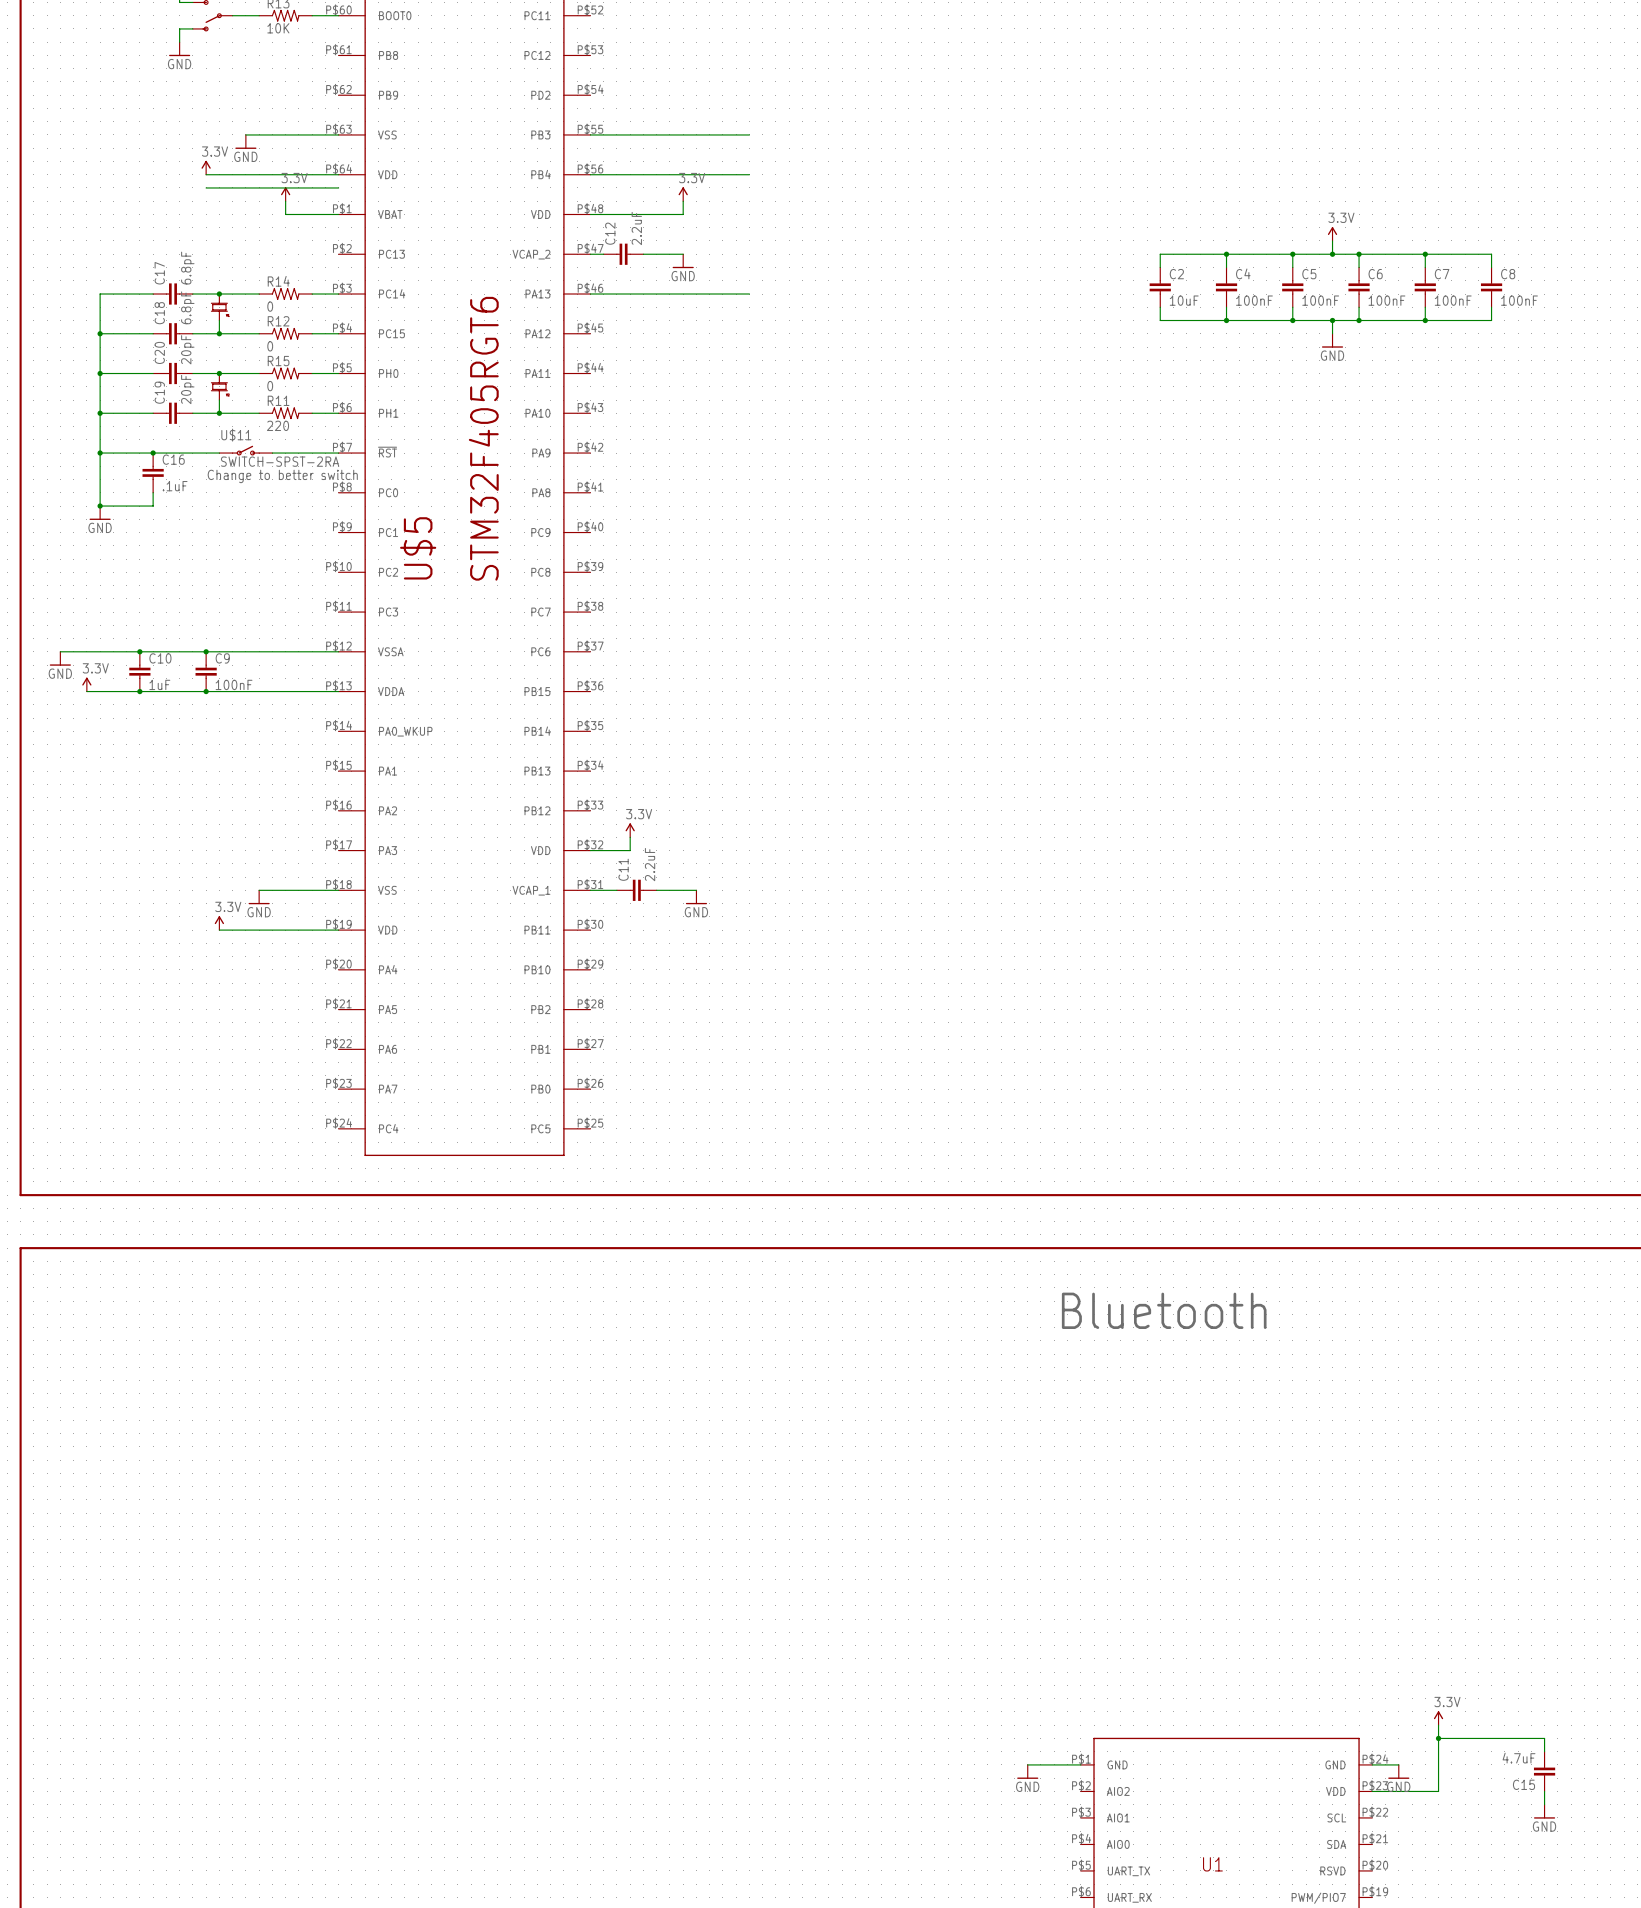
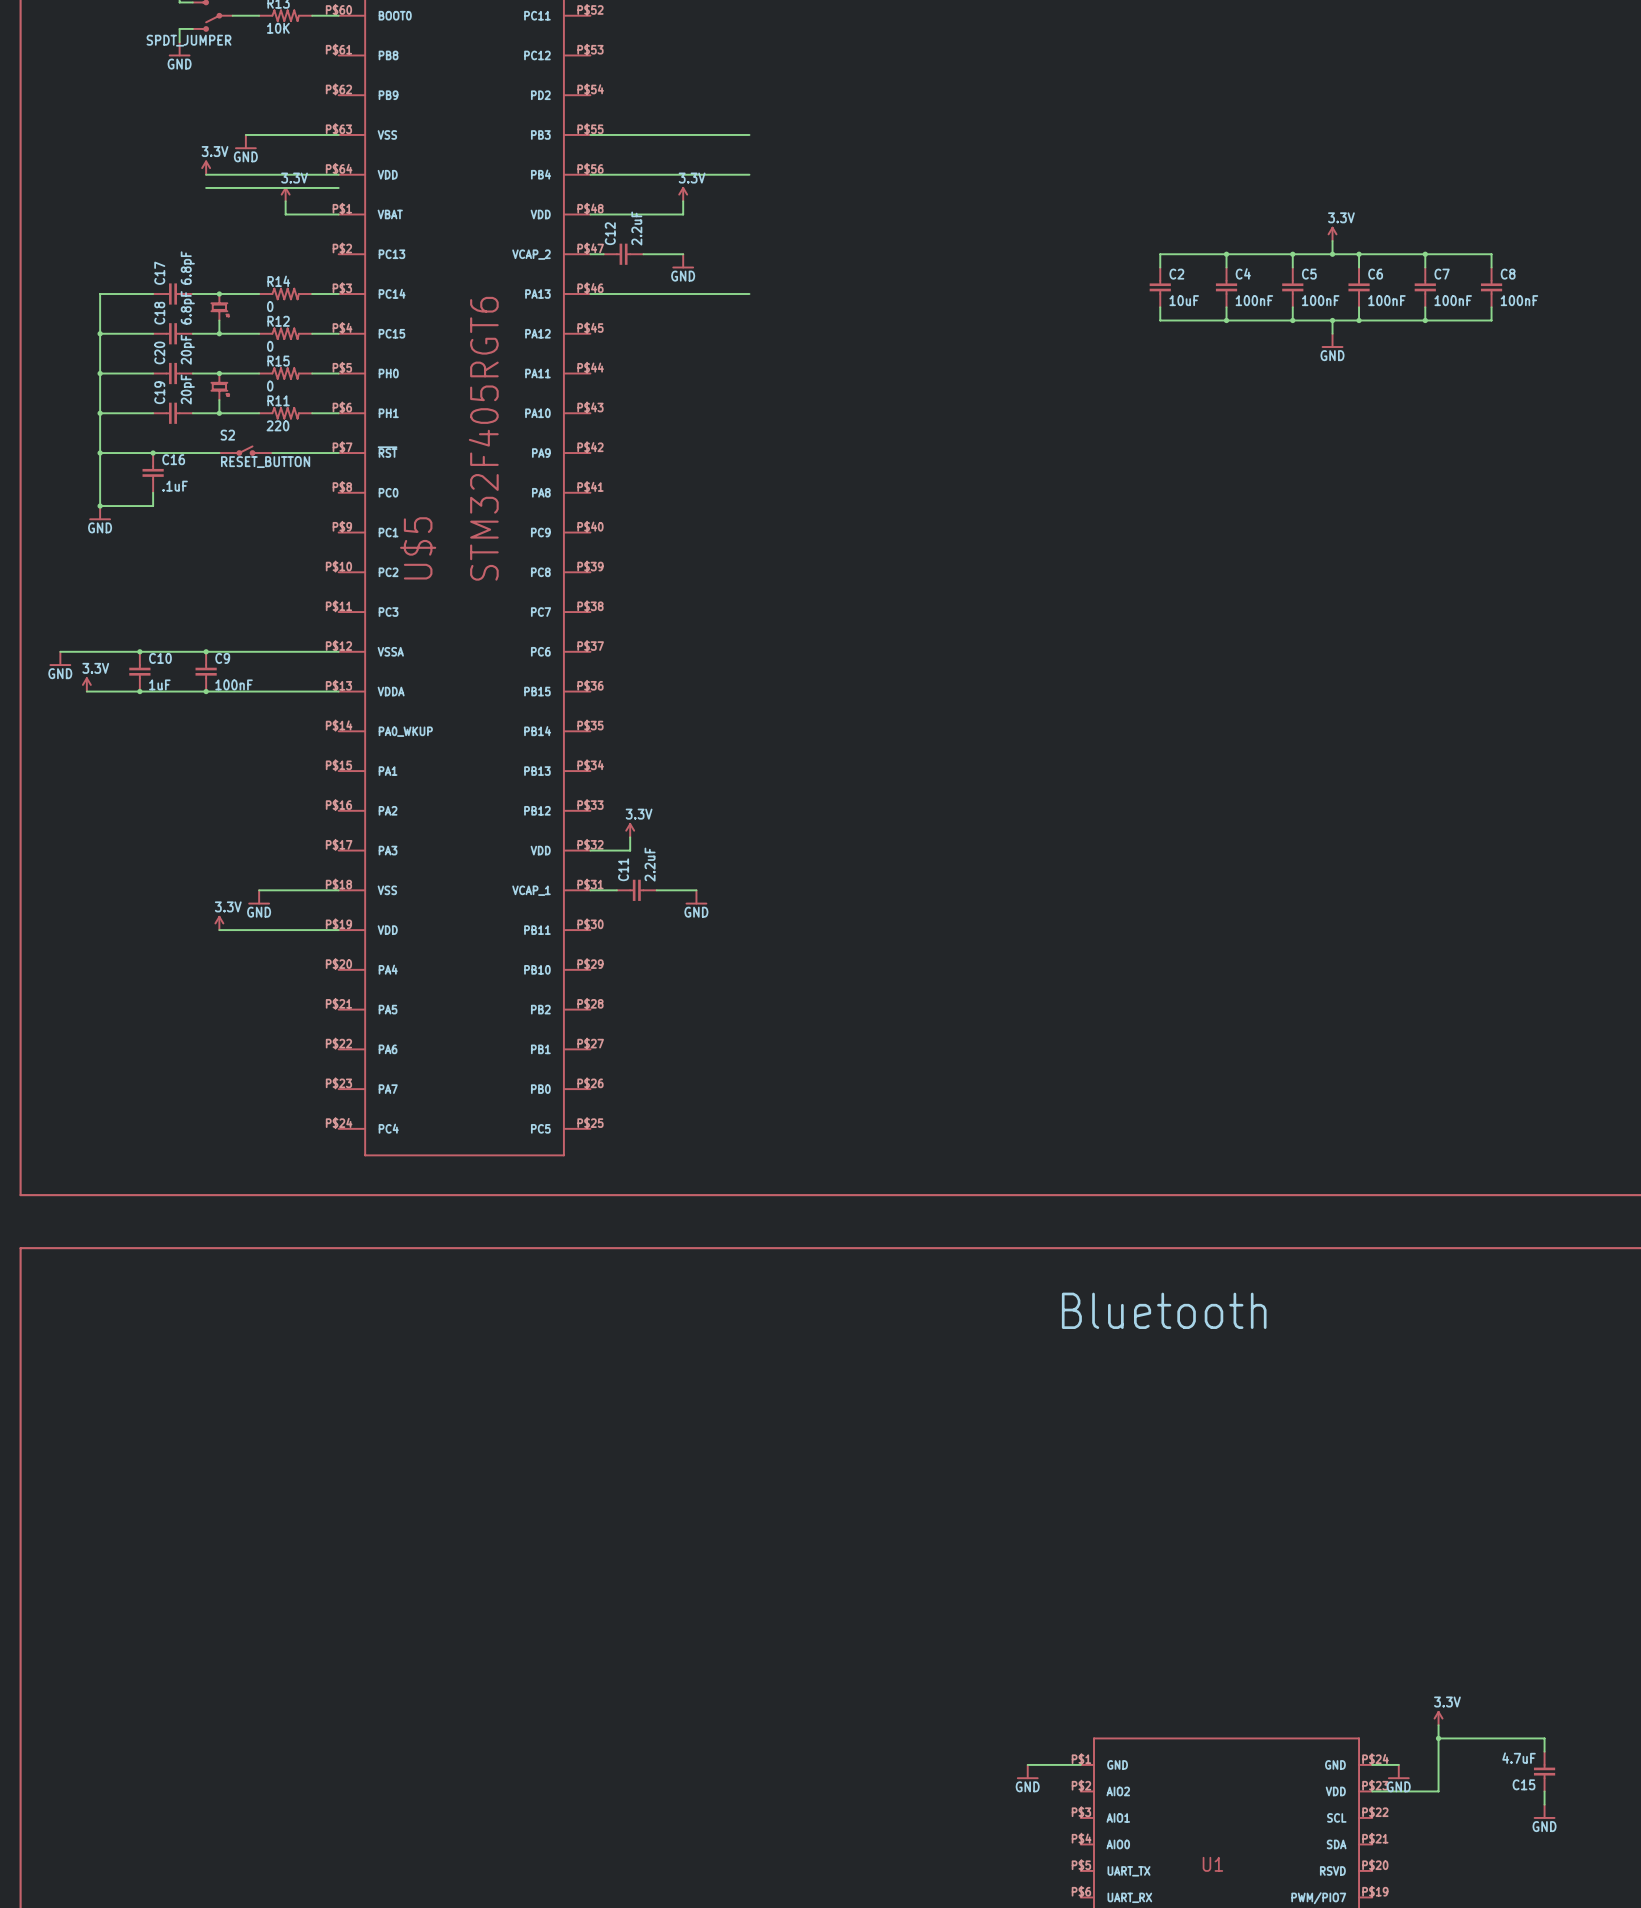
part value: none -> SPDT_JUMPER (189, 40)
U$11 name: U$11 (236, 435) -> S2 (227, 435)
U$11 value: SWITCH-SPST-2RA (280, 461) -> RESET_BUTTON (265, 462)
text: Change to better switch (282, 476) -> none

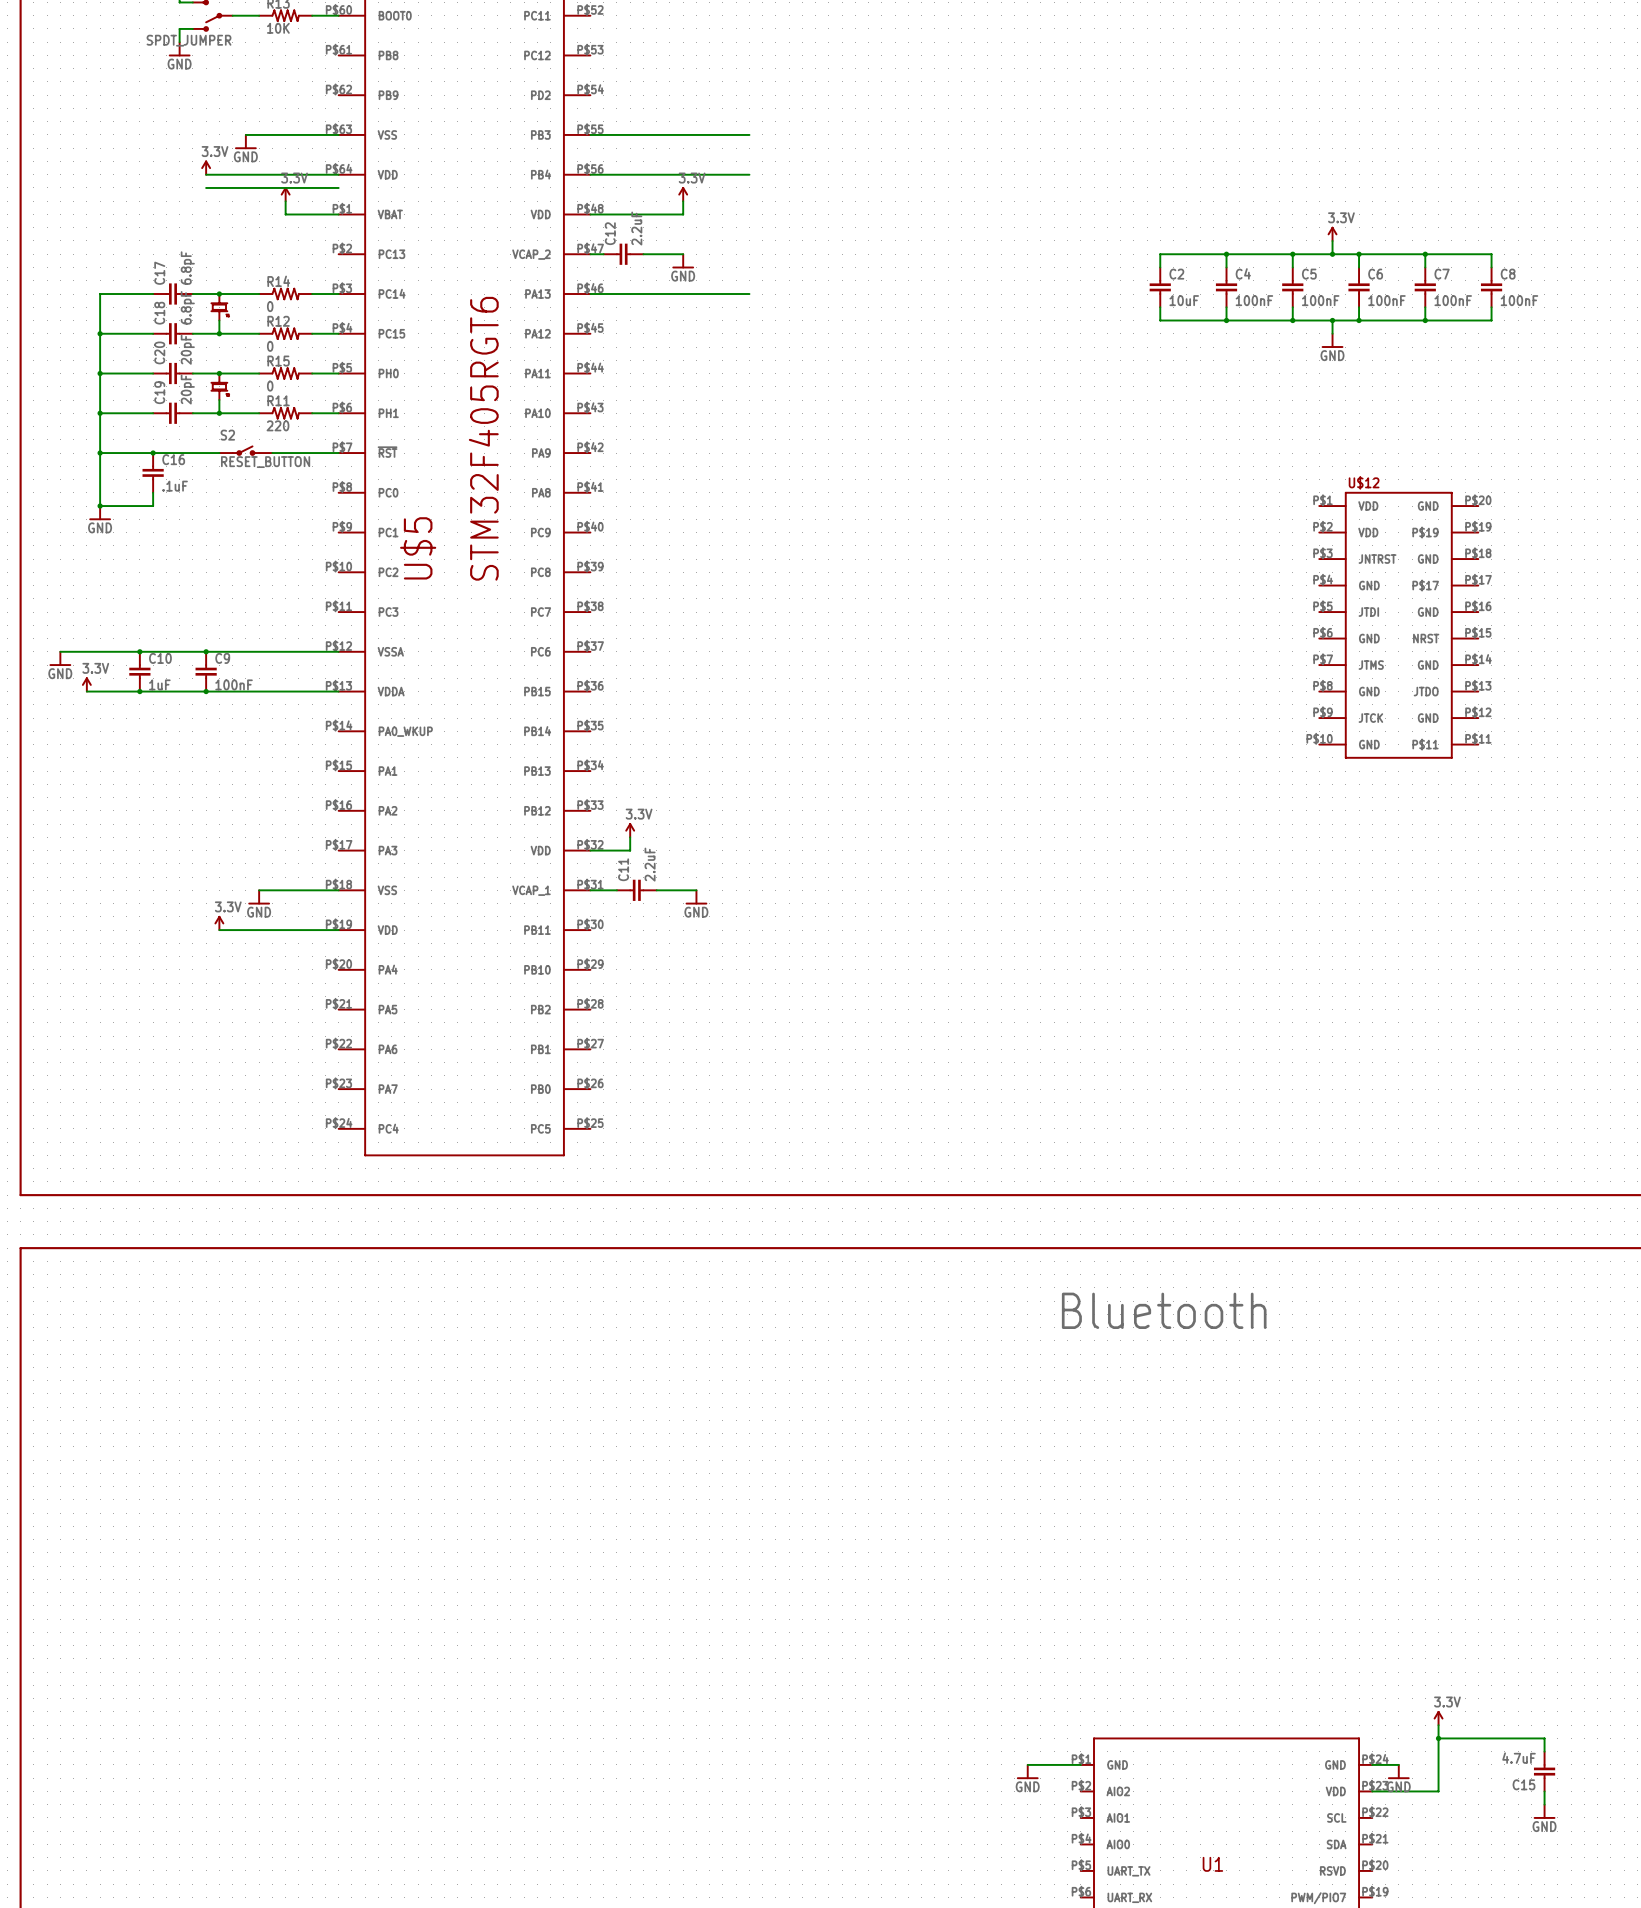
U$12: none -> (1398, 625)

